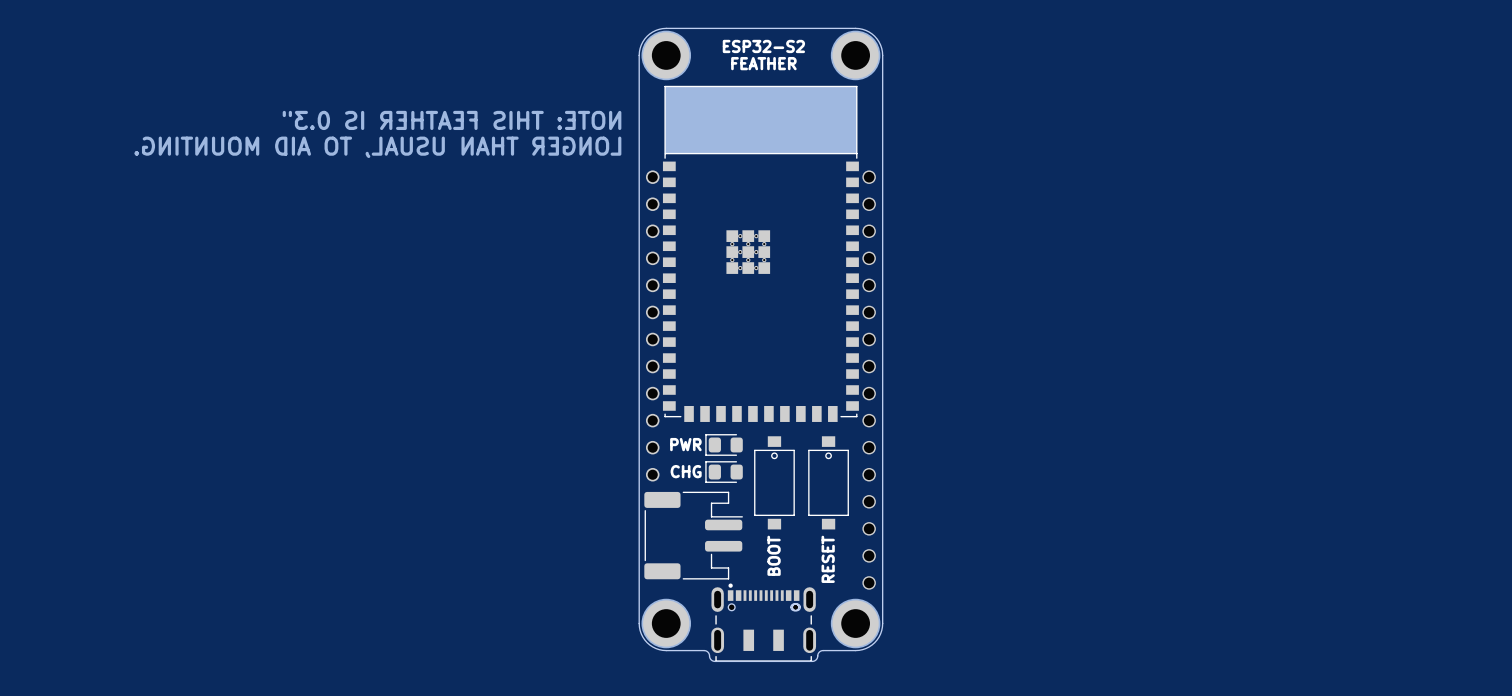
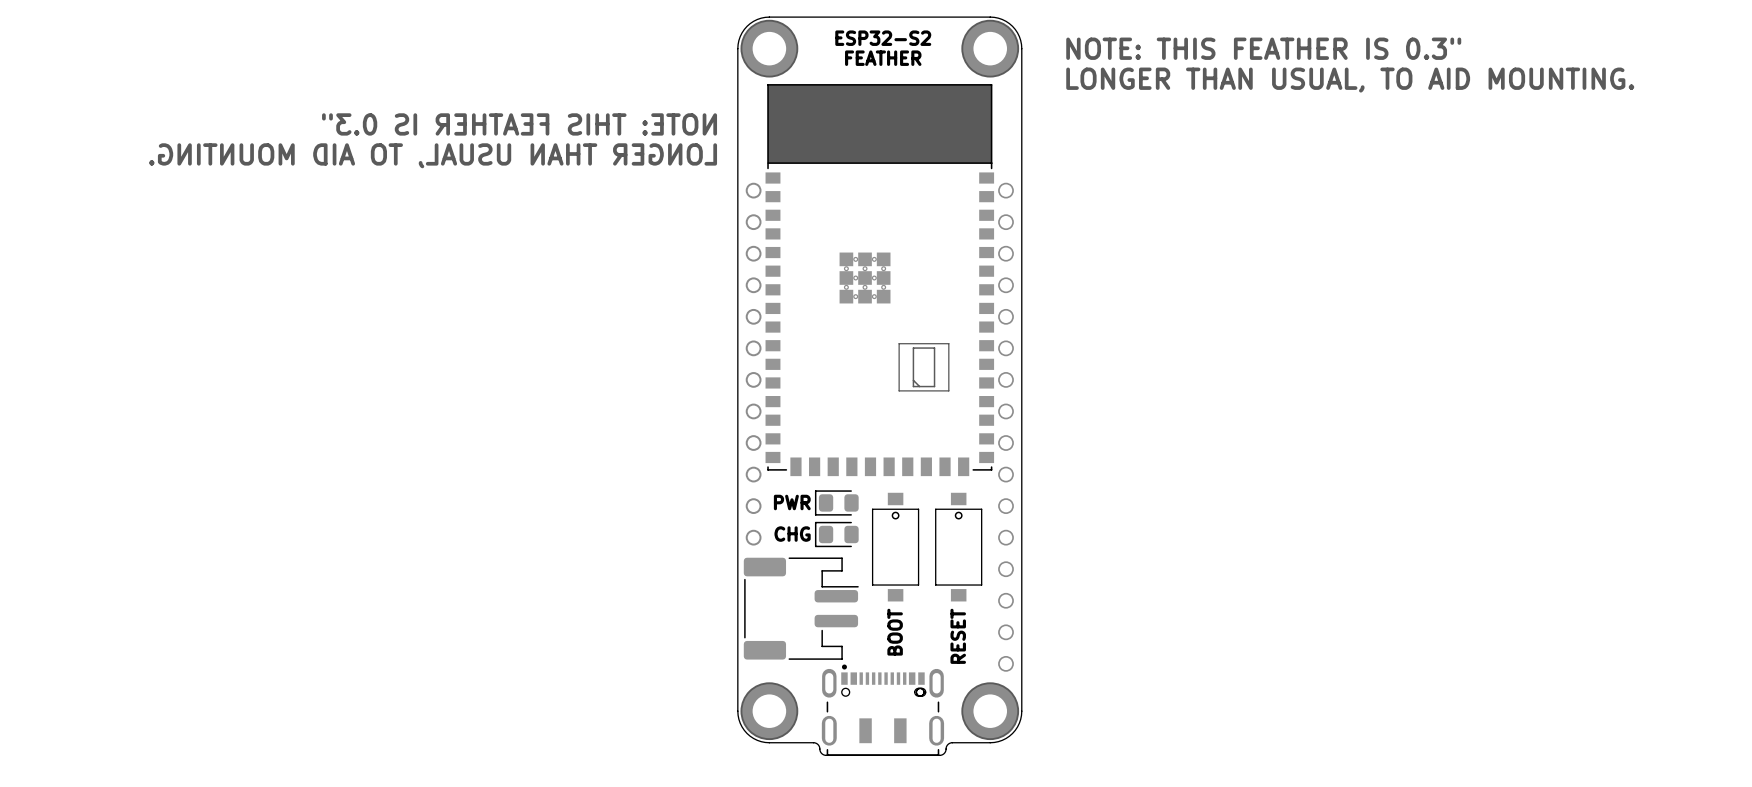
text: none -> NOTE: THIS FEATHER IS 0.3" (1263, 48)
text: none -> LONGER THAN USUAL, TO AID MOUNTING. (1350, 80)
part: none -> (923, 367)

